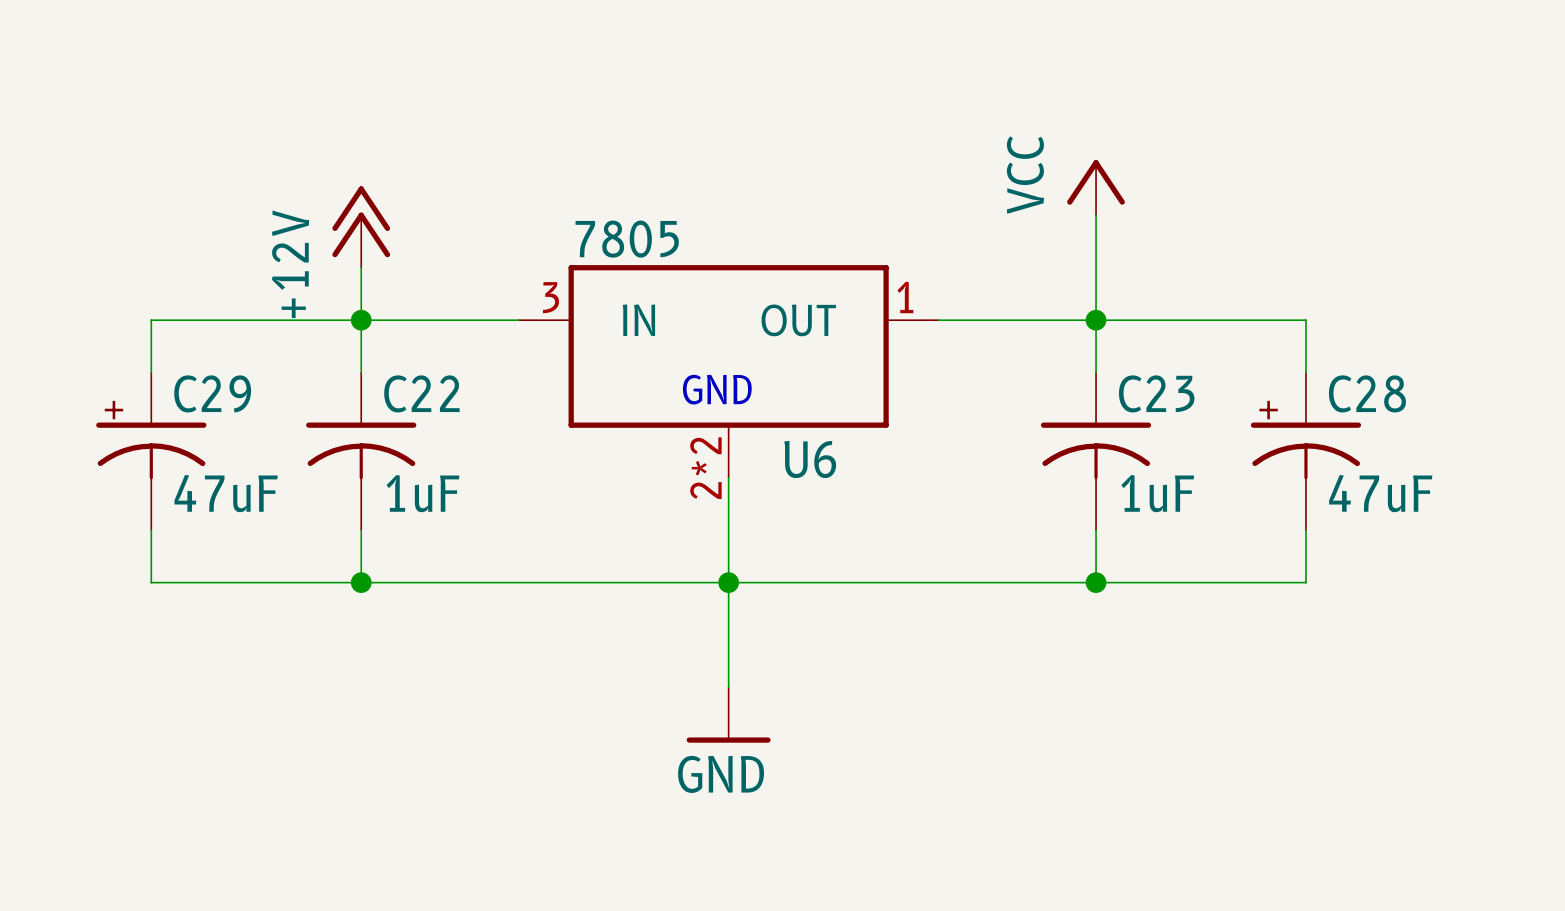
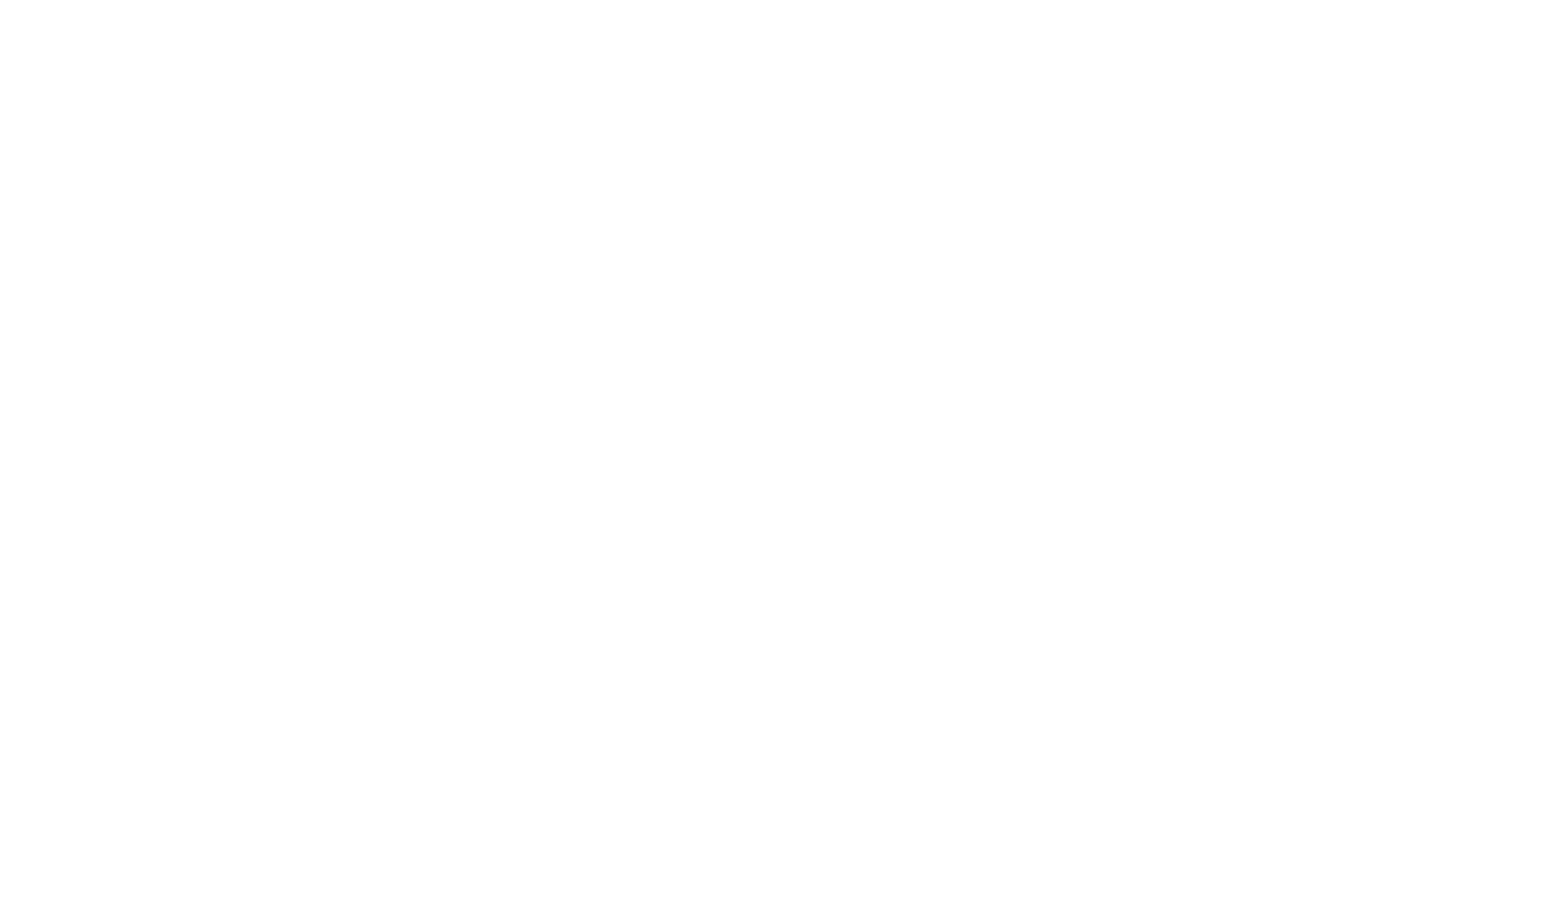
power symbol: VCC (1096, 187) -> none
wire: (1096, 215) (1096, 372) -> none
power symbol: +12V (361, 227) -> none
wire: (361, 267) (361, 372) -> none
junction: (361, 320) -> none
wire: (518, 320) (151, 320) (151, 372) -> none
wire: (938, 320) (1305, 320) (1305, 372) -> none
junction: (1096, 320) -> none
U6: 7805 (728, 371) -> none
C29: 47uF (151, 451) -> none
C22: 1uF (361, 451) -> none
C23: 1uF (1096, 451) -> none
C28: 47uF (1305, 451) -> none
wire: (728, 477) (728, 687) -> none
wire: (151, 530) (151, 582) (1305, 582) (1305, 530) -> none
wire: (361, 530) (361, 582) -> none
wire: (1096, 530) (1096, 582) -> none
junction: (361, 582) -> none
junction: (728, 582) -> none
junction: (1096, 582) -> none
power symbol: GND (728, 715) -> none

